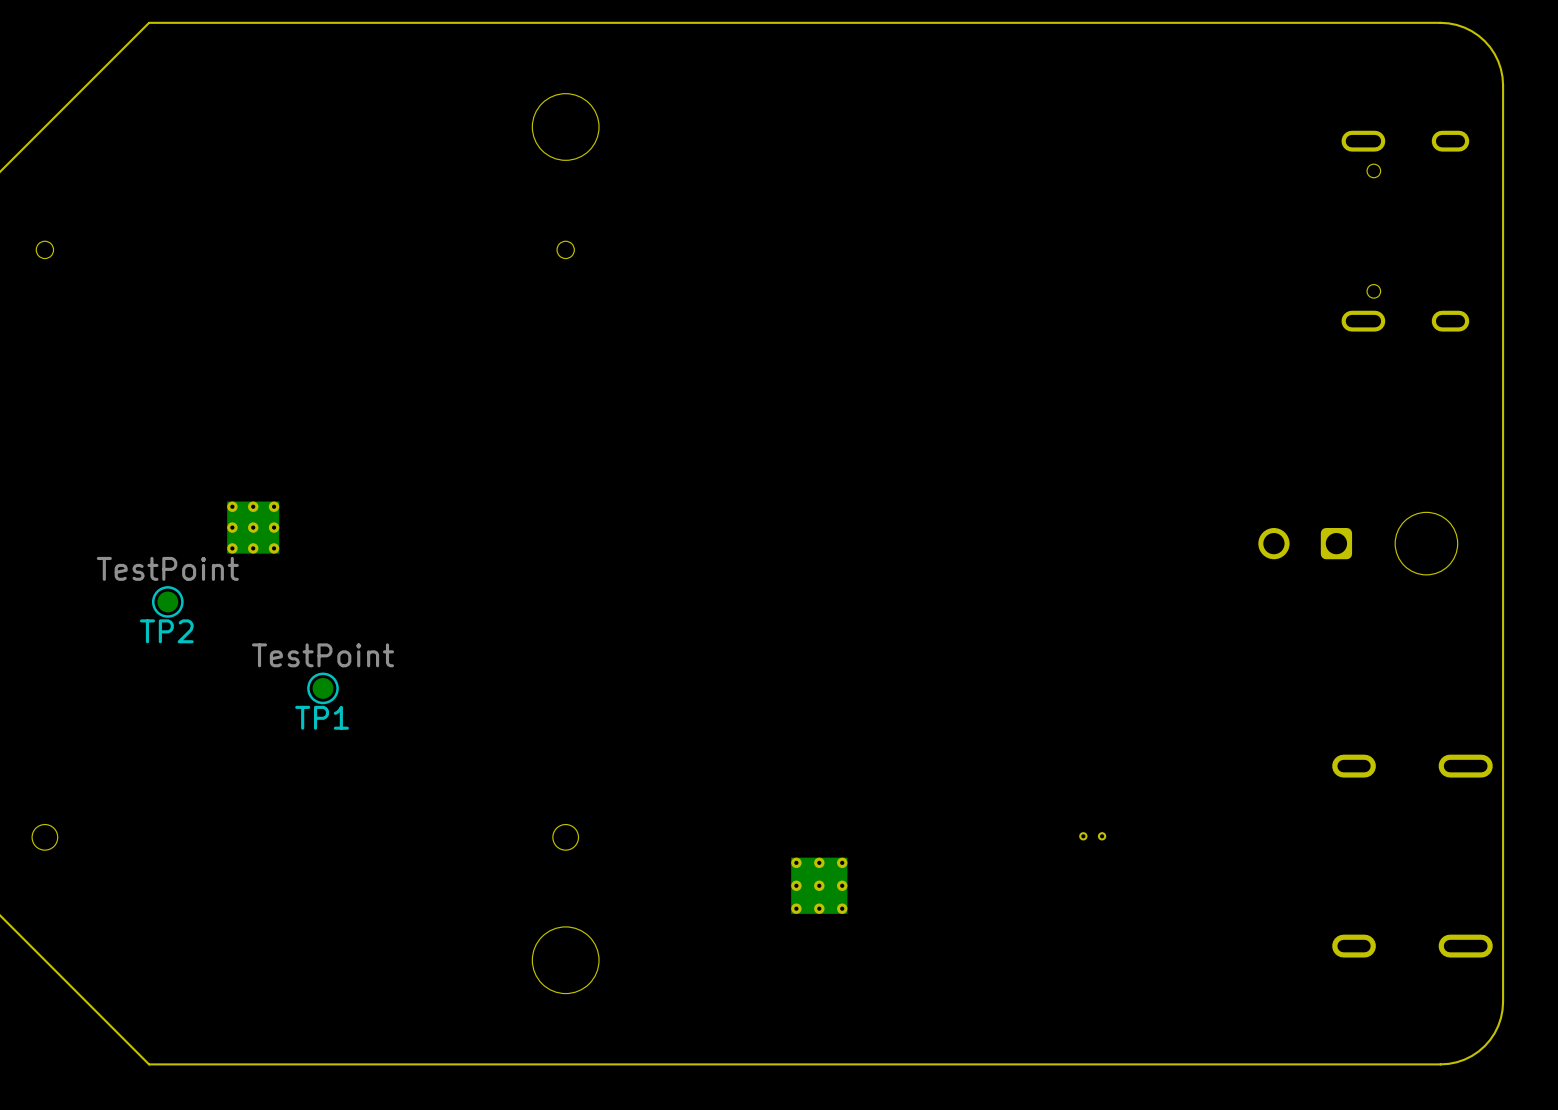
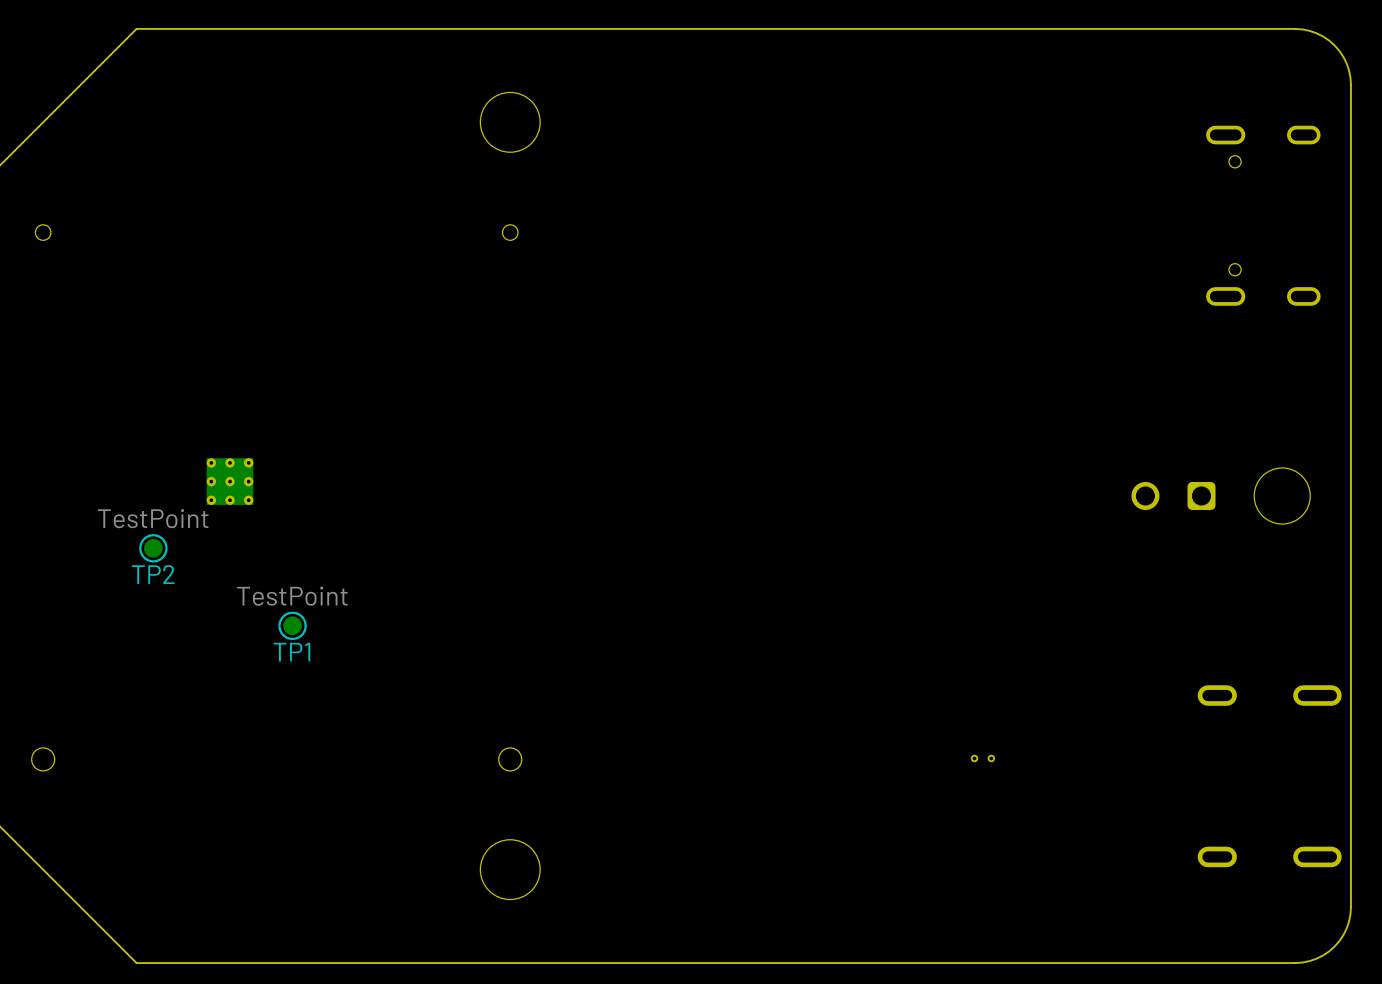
part: (819, 885) -> none

